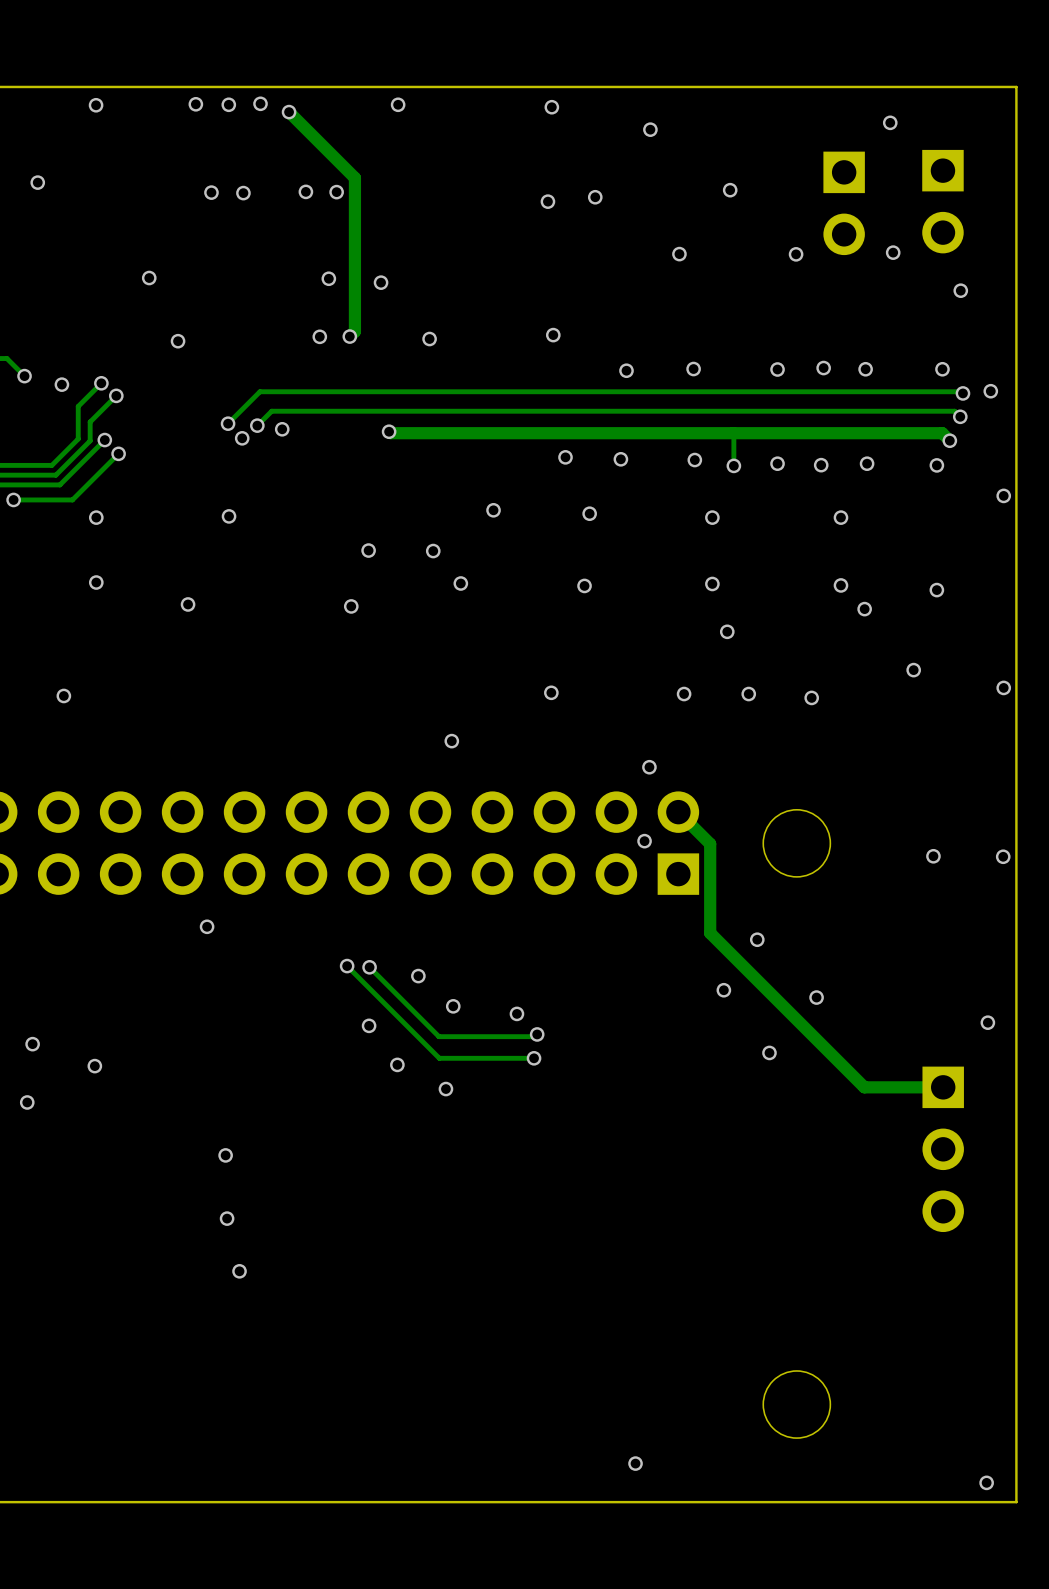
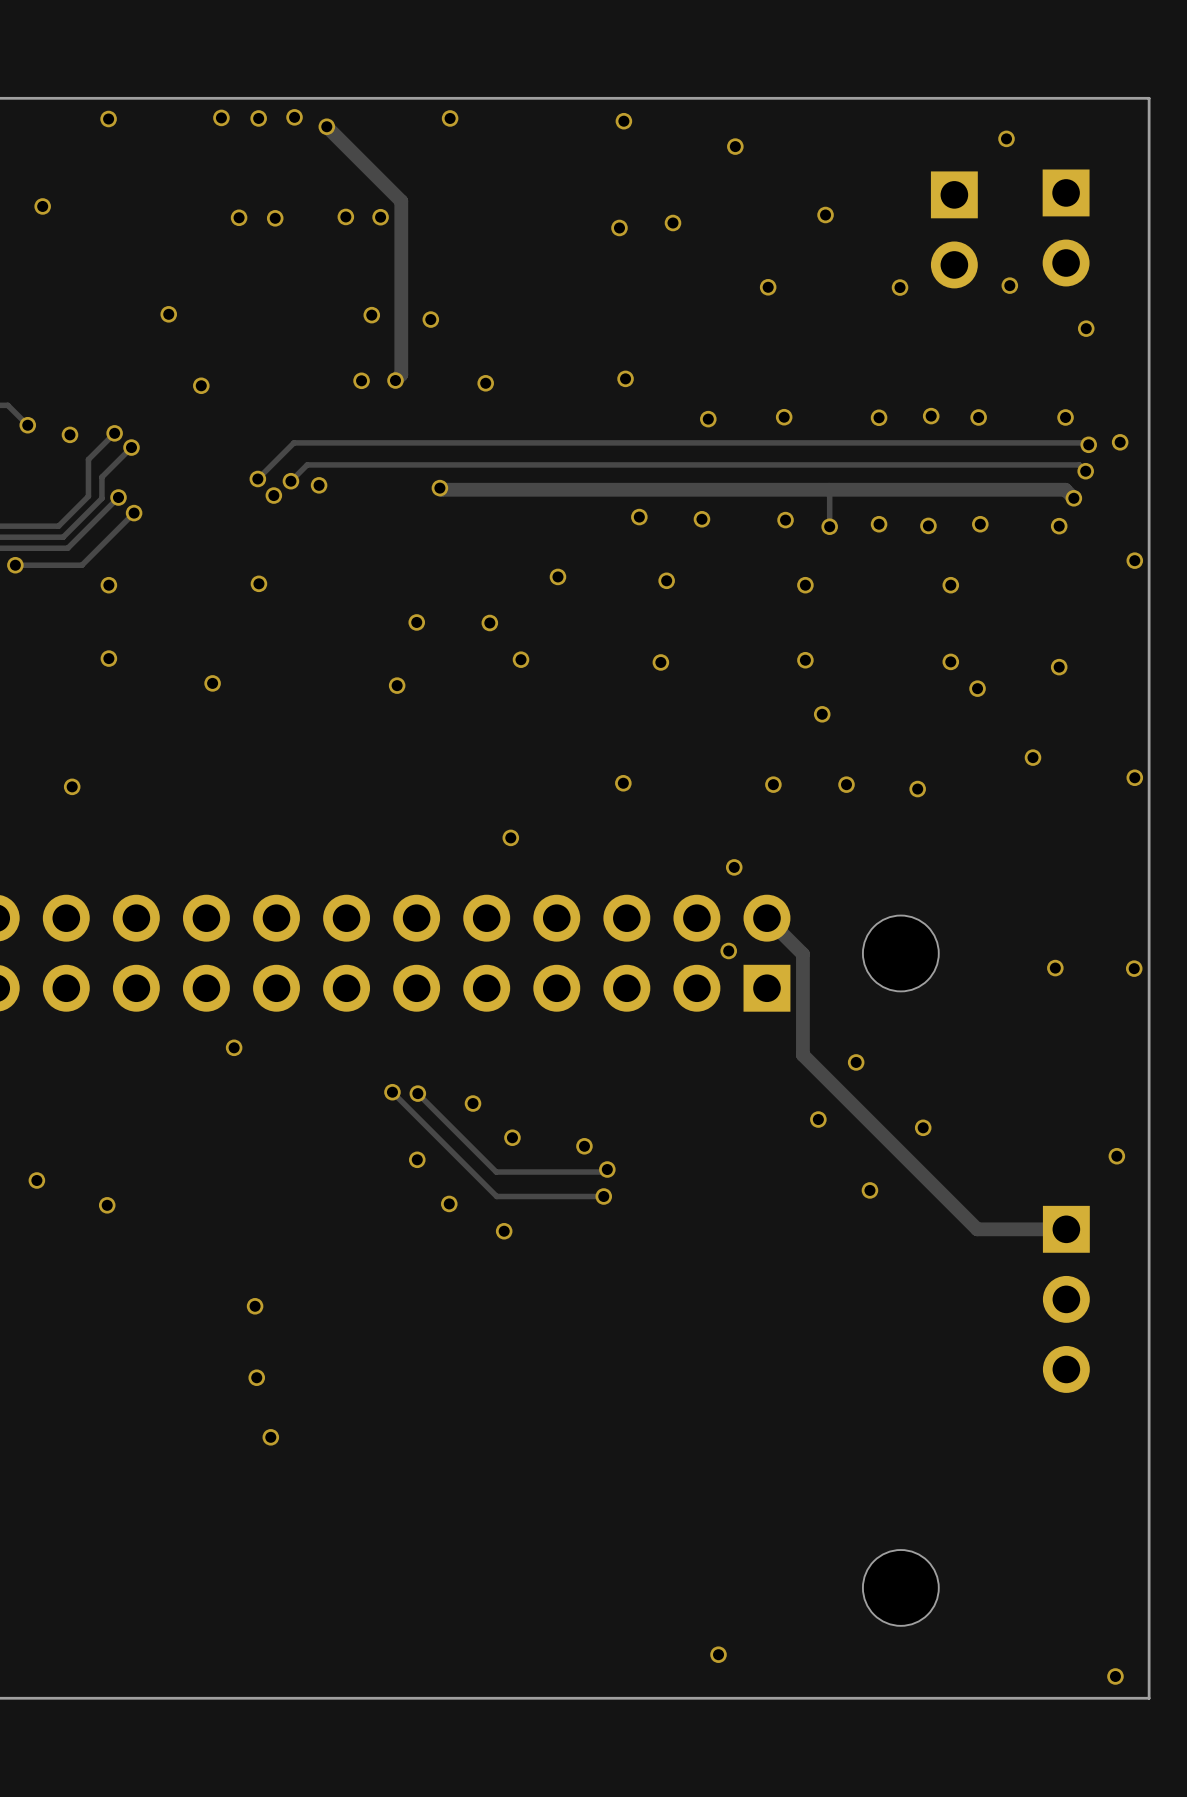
via: (27, 1102) -> none

